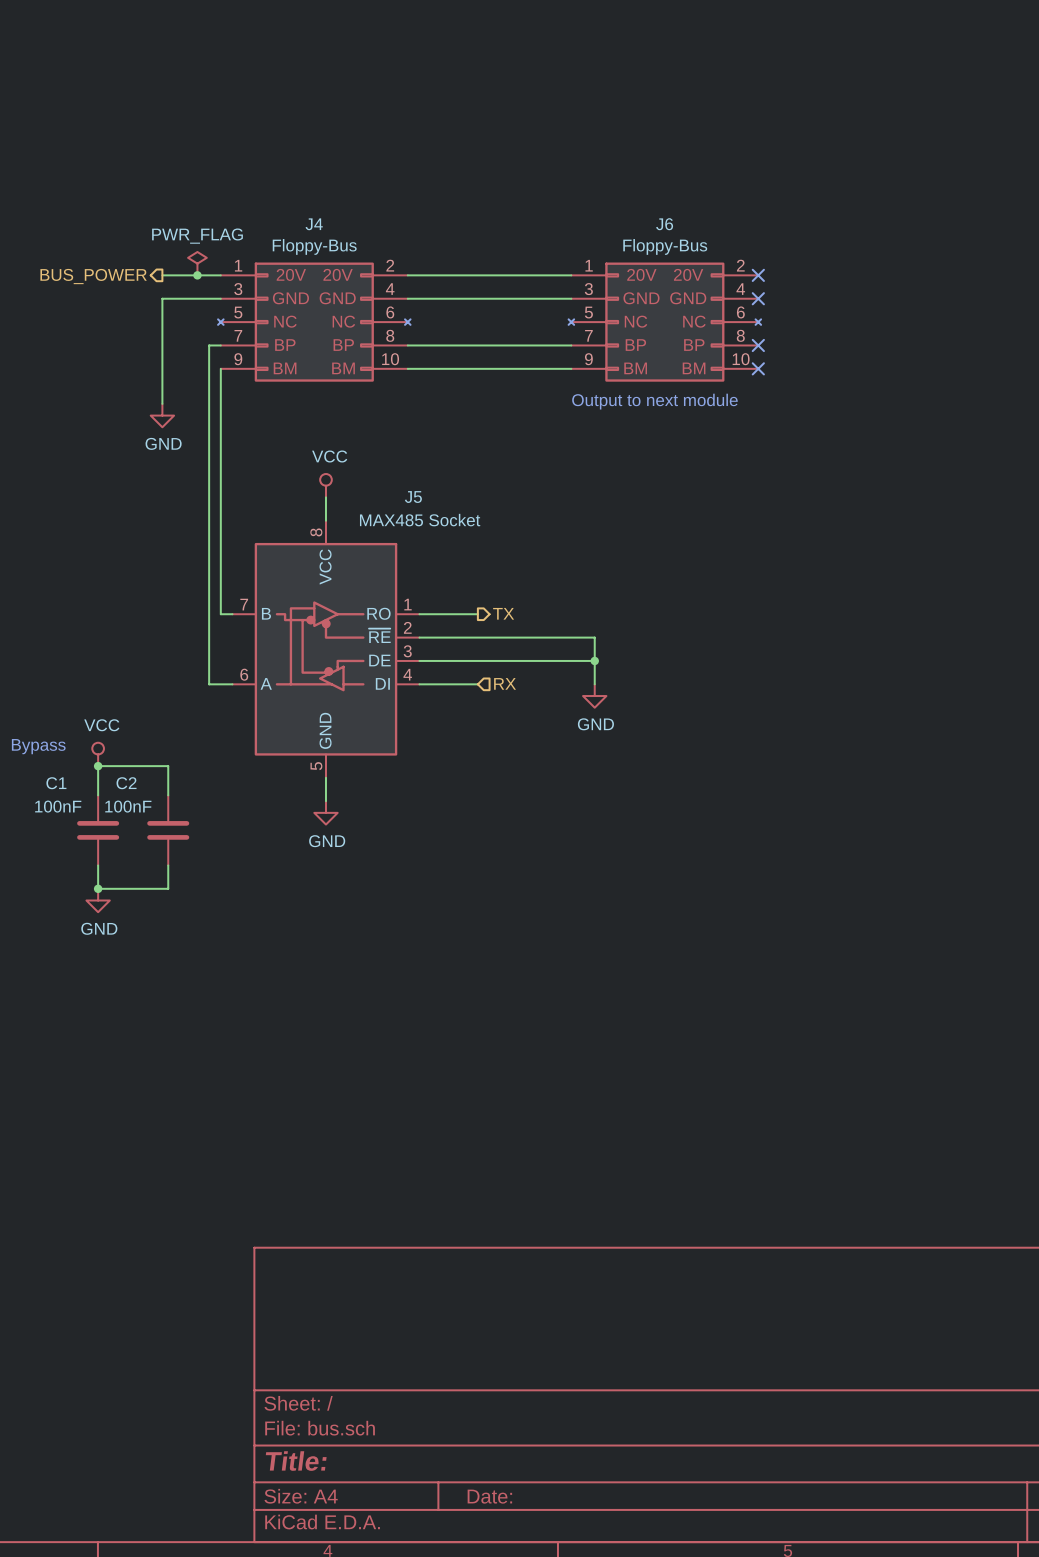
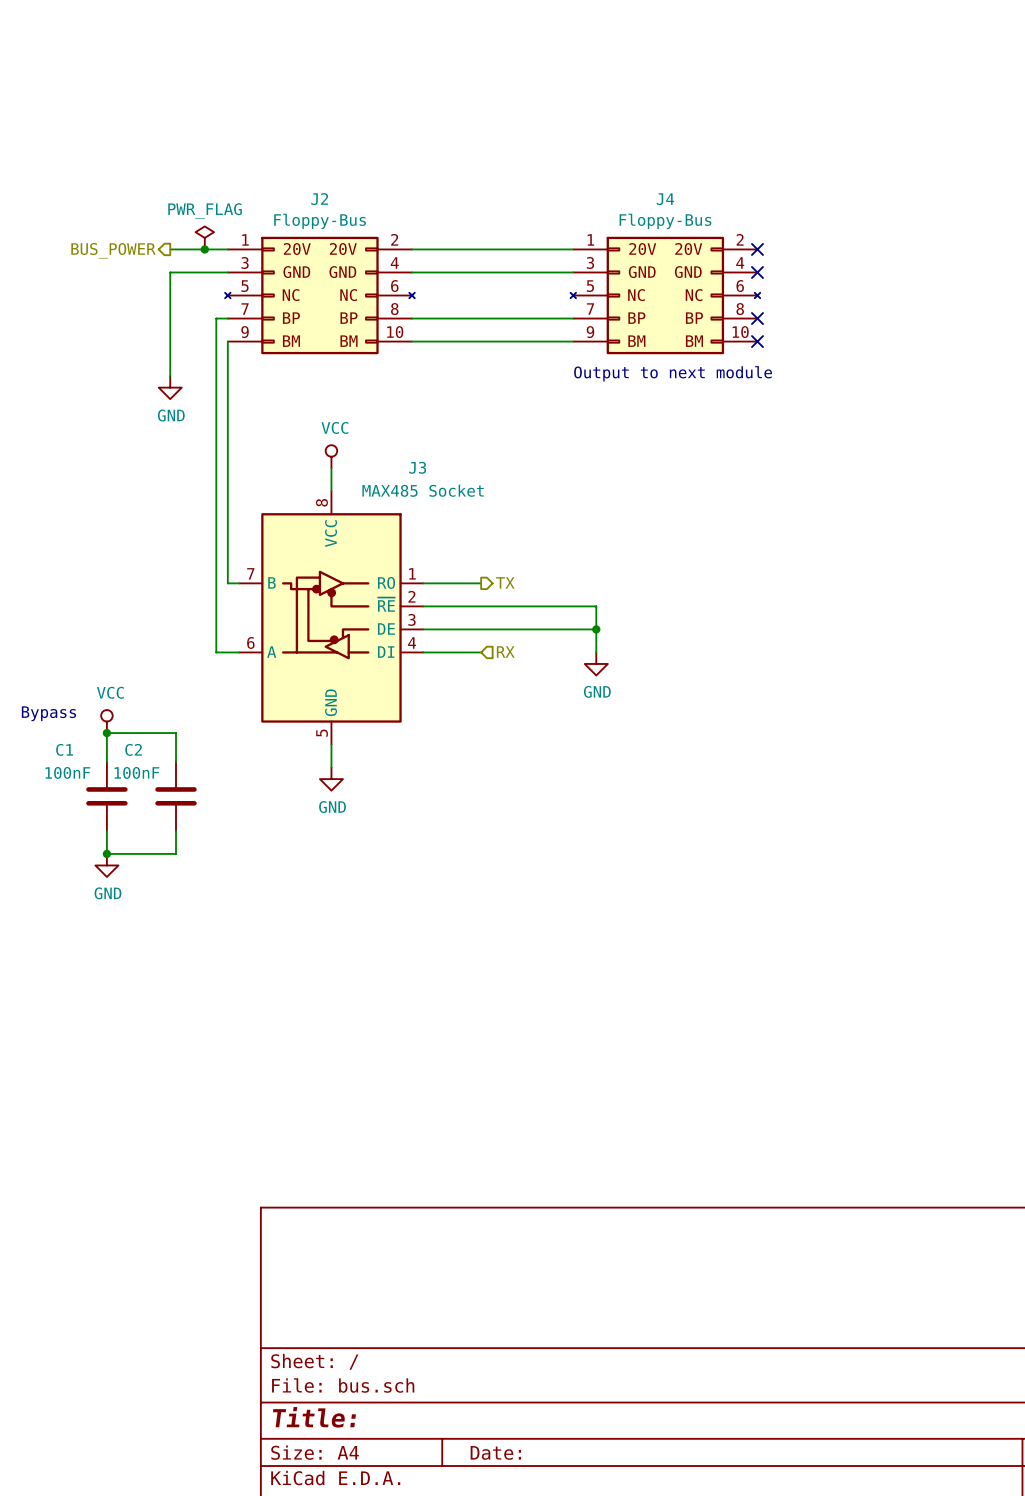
J4 name: J4 (314, 224) -> J2 (319, 199)
J6 name: J6 (664, 224) -> J4 (665, 199)
J5 name: J5 (413, 497) -> J3 (417, 467)

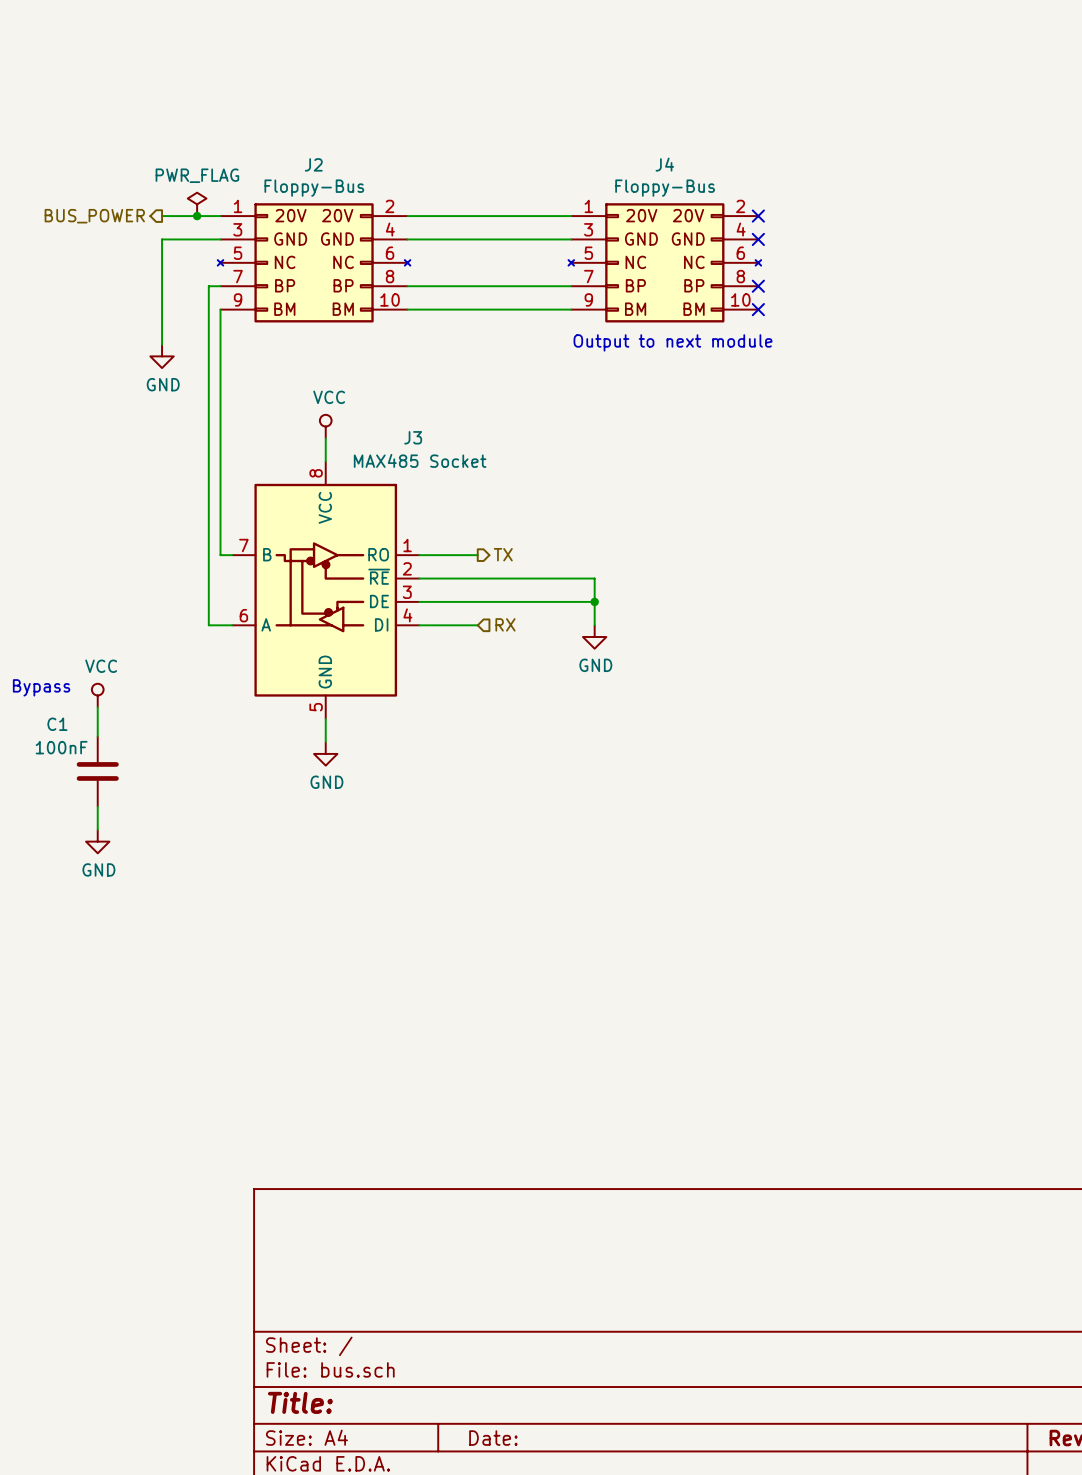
wire: (106, 733) (176, 733) (176, 761) -> none
junction: (106, 733) -> none
C2: 100nF (176, 796) -> none
wire: (176, 830) (176, 853) (106, 853) -> none
junction: (106, 853) -> none

